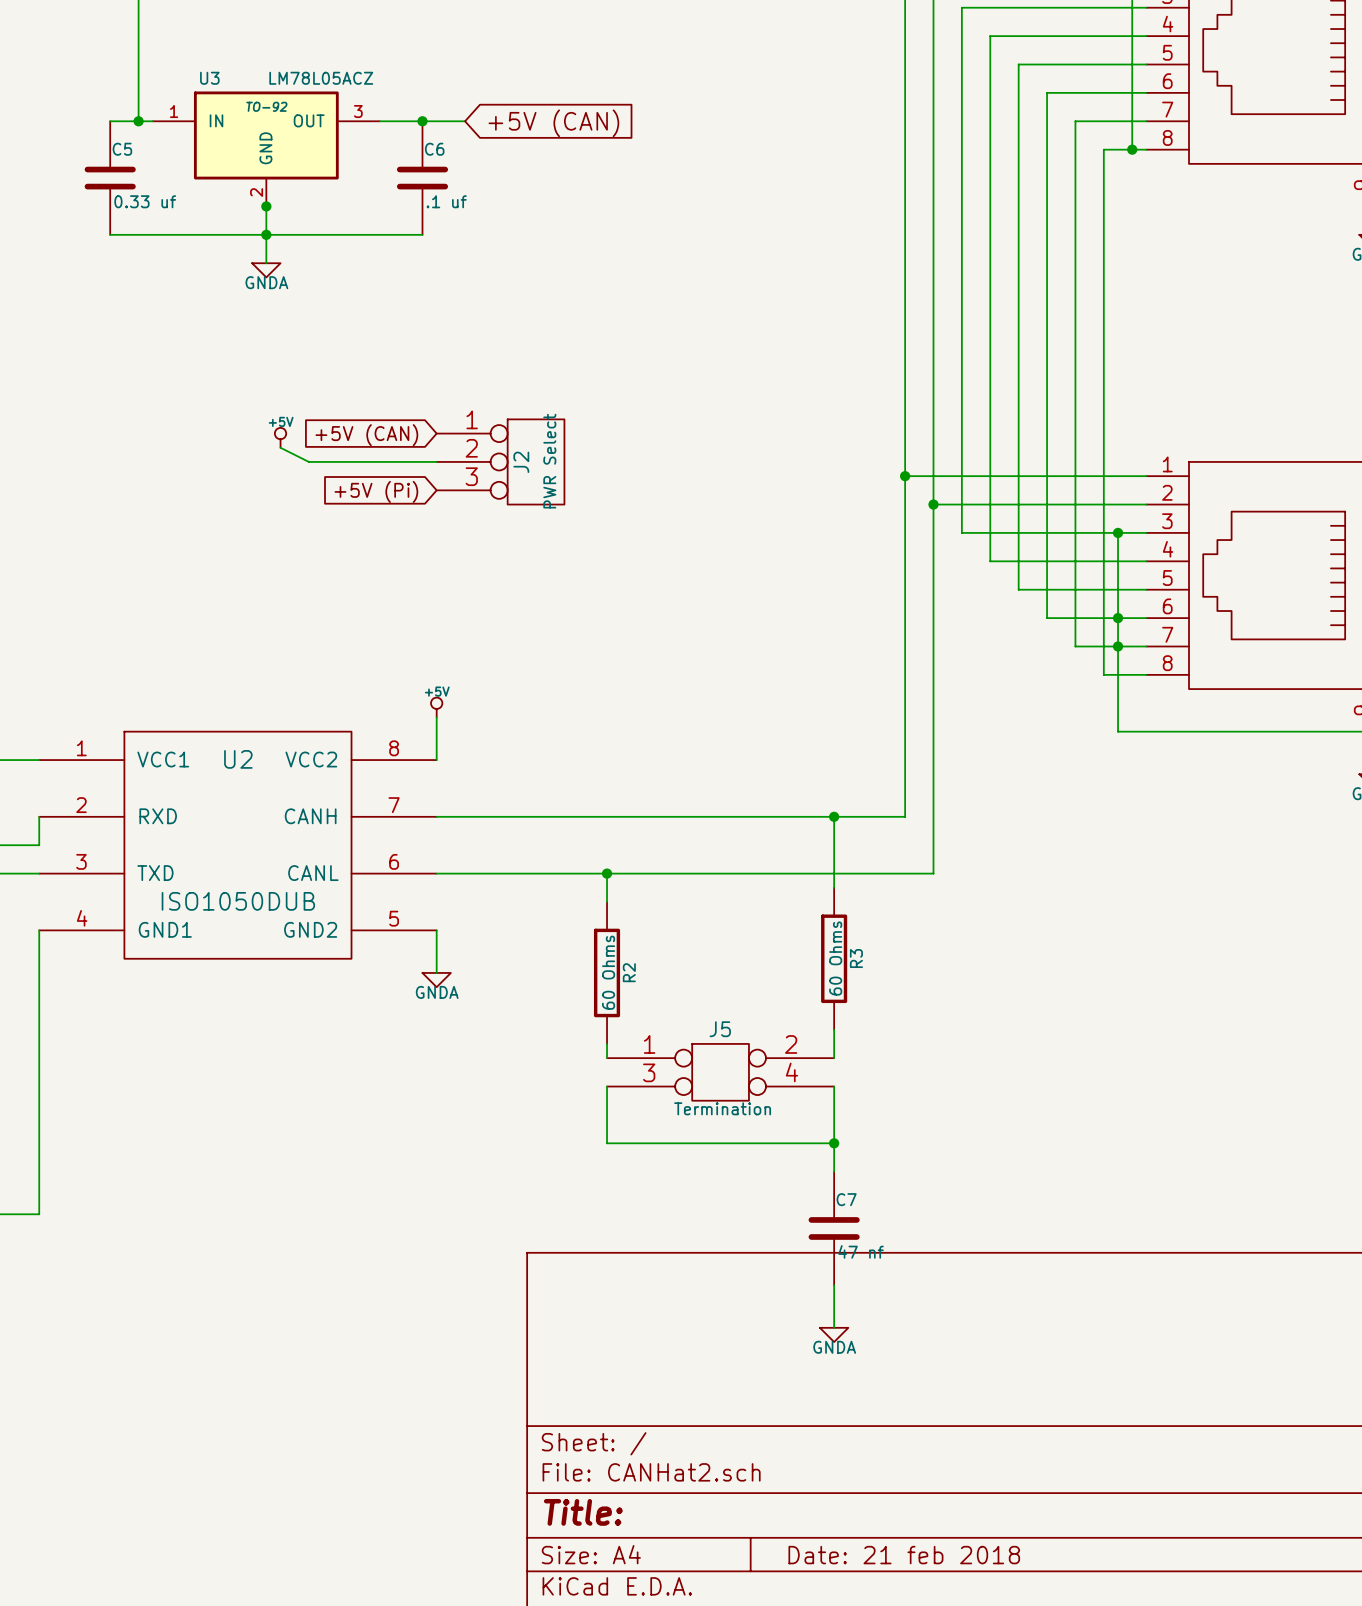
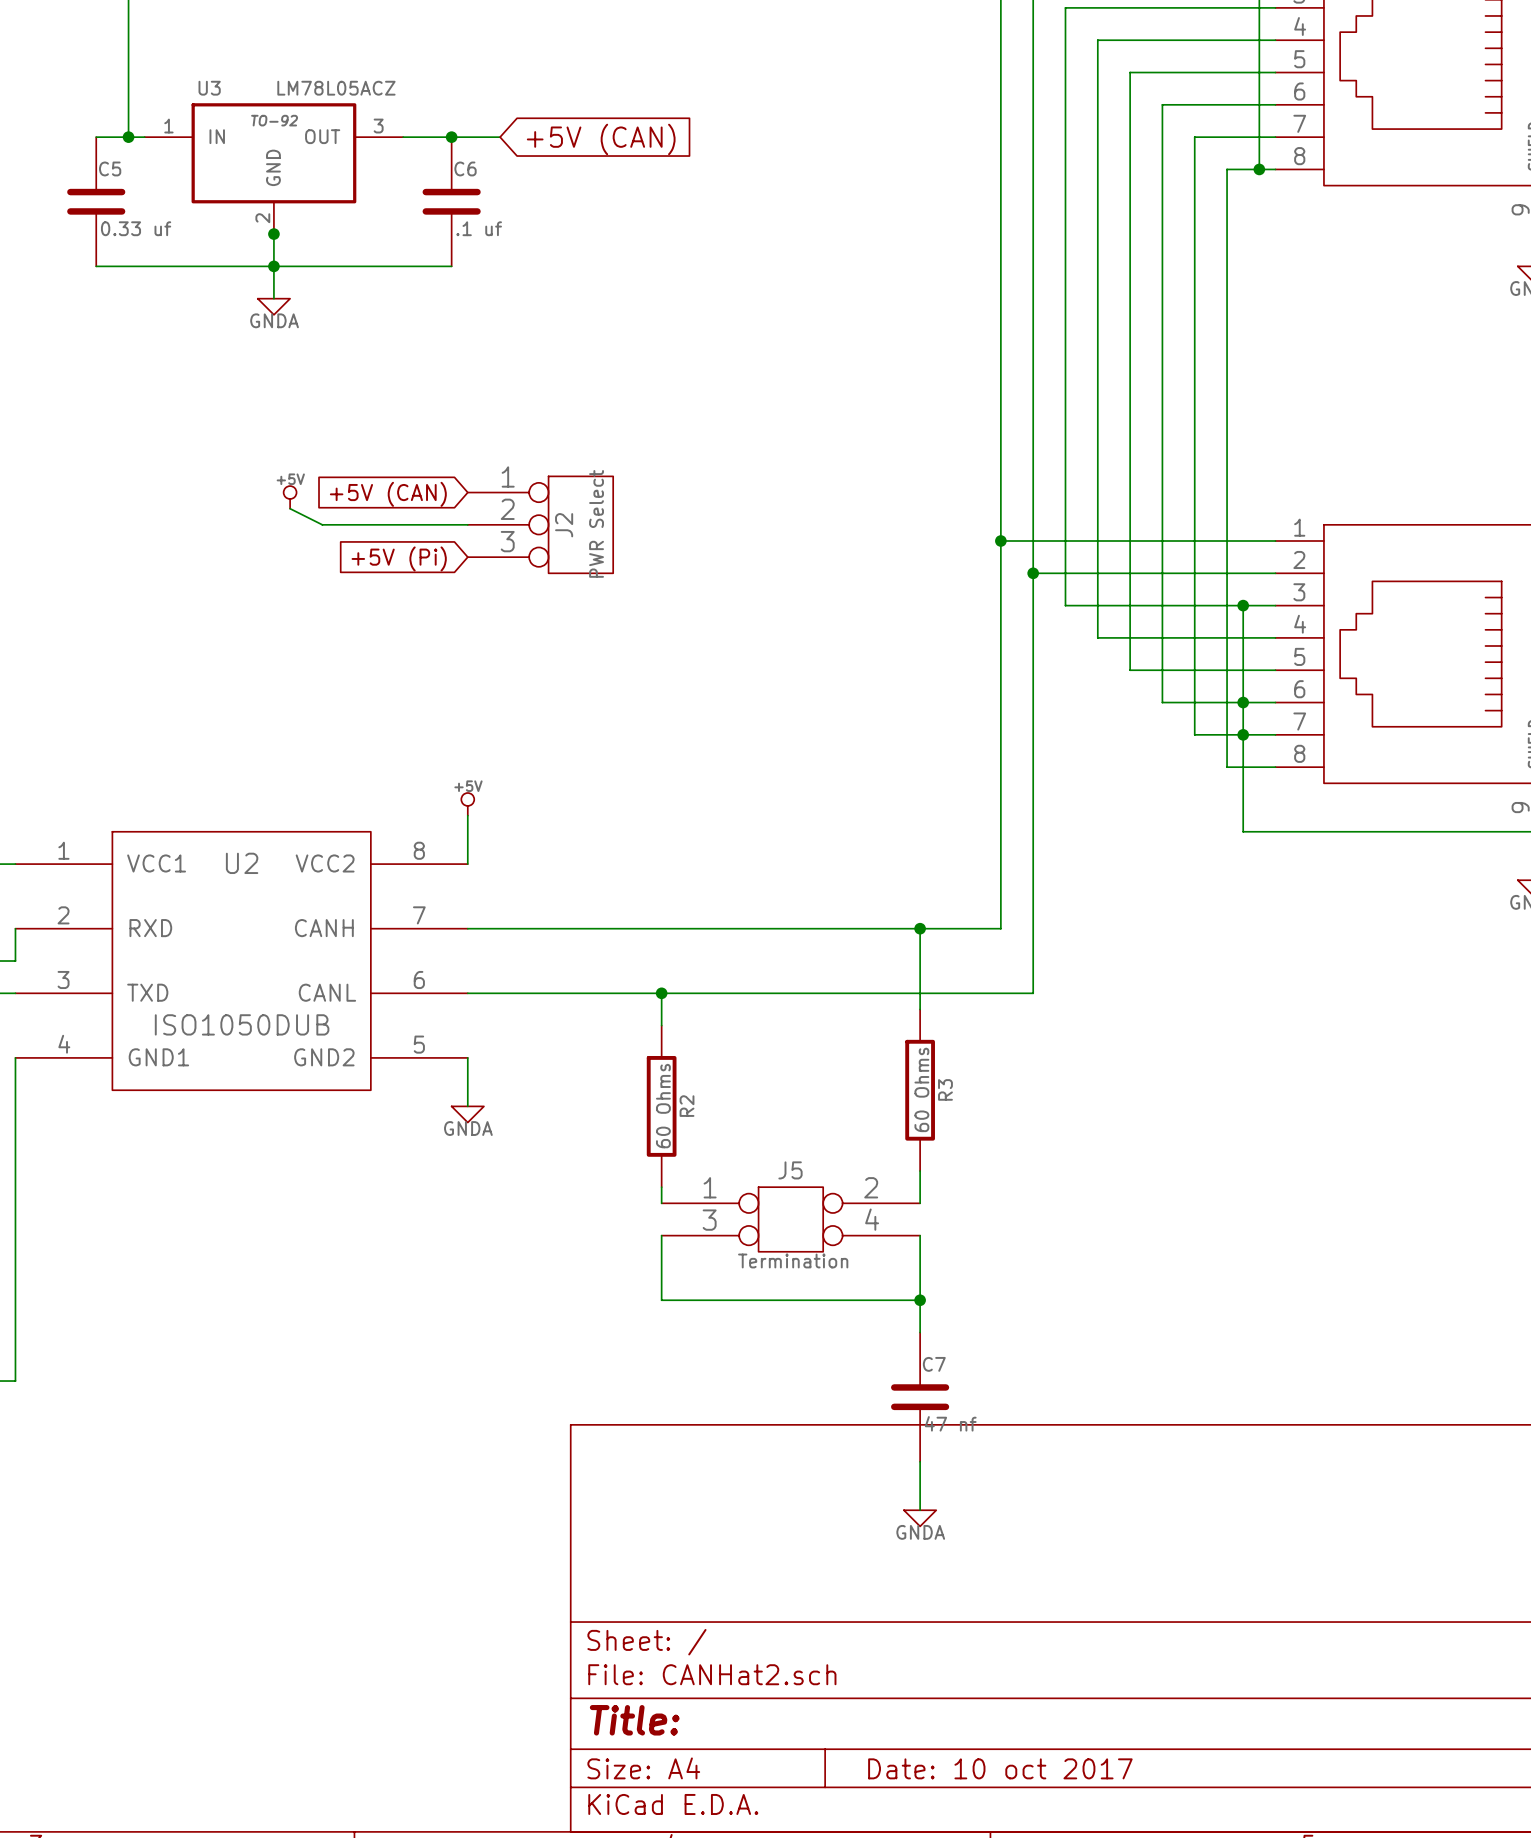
title block: Date: 21 feb 2018 (904, 1555) -> Date: 10 oct 2017 (1000, 1768)

